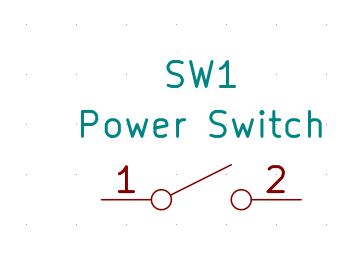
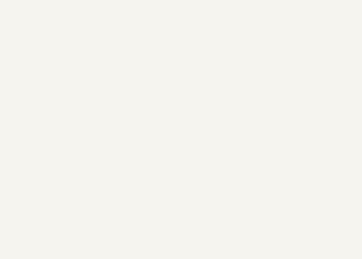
SW1: Power Switch (201, 187) -> none

